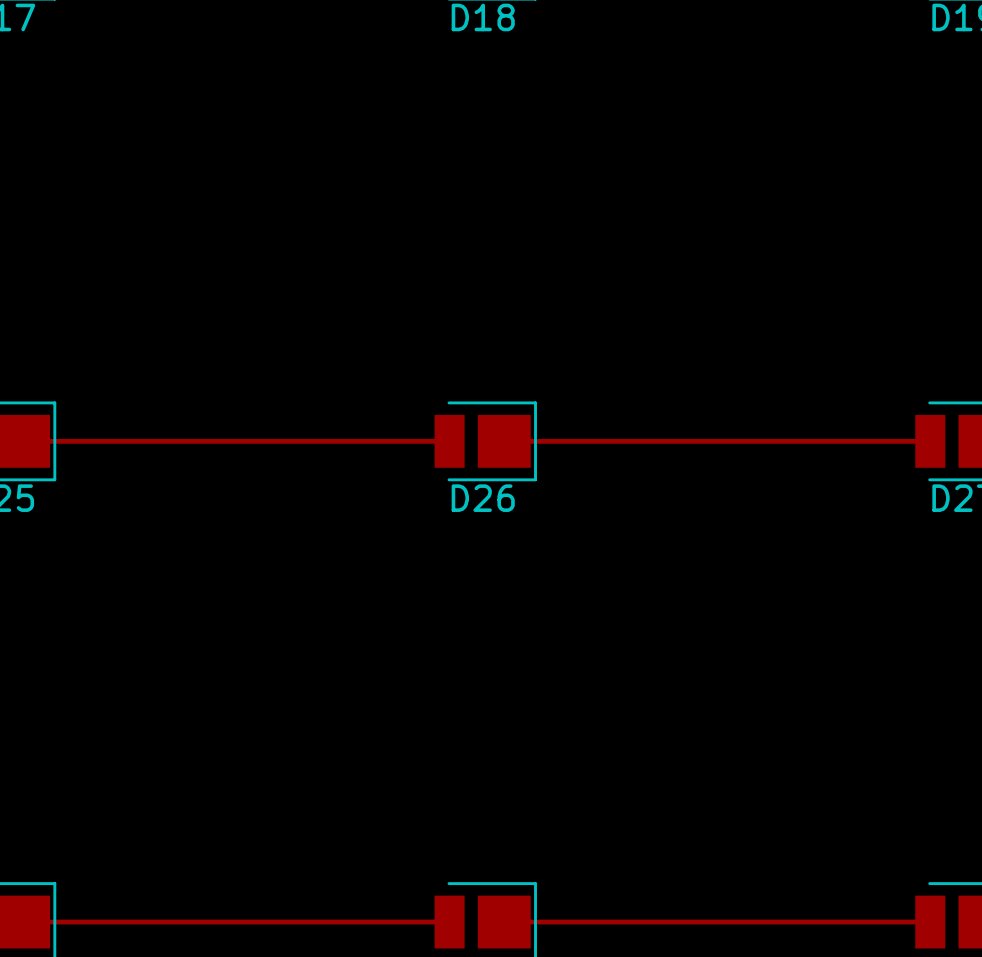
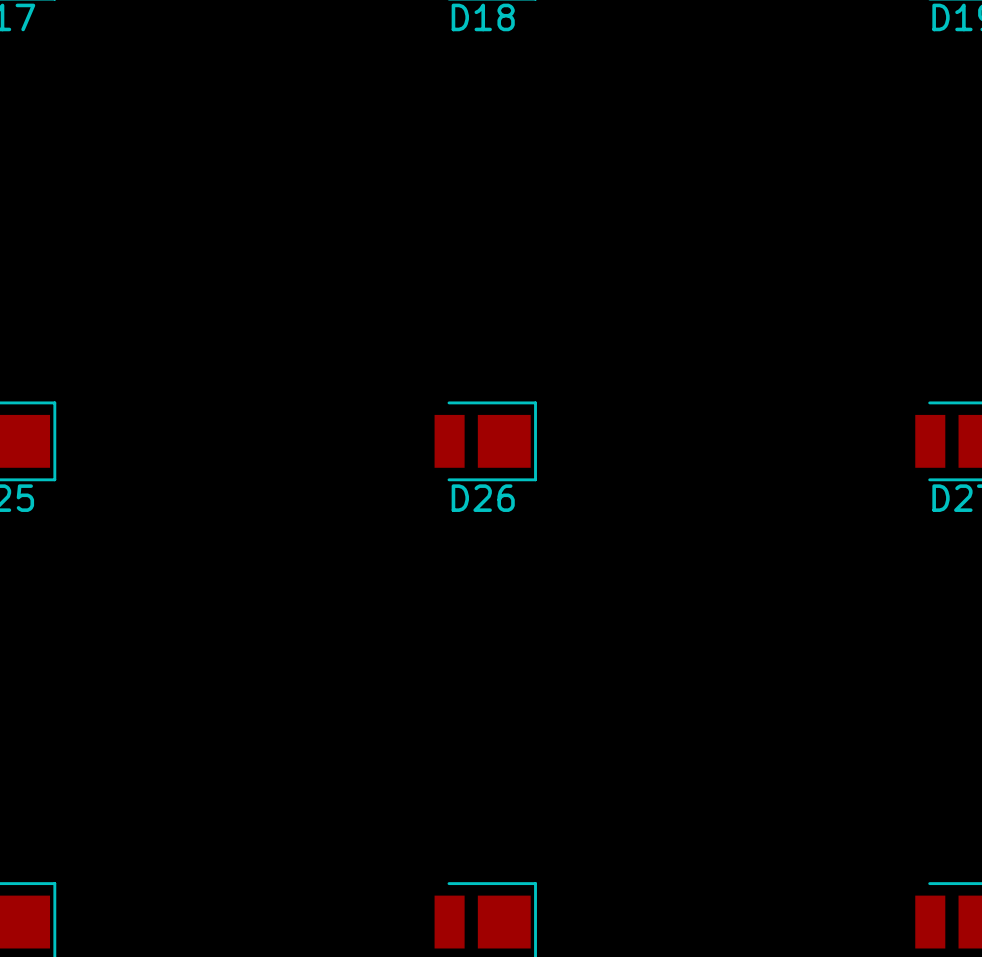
top track: (23, 441) (449, 441) -> none
top track: (504, 441) (930, 441) -> none
top track: (23, 922) (449, 922) -> none
top track: (504, 922) (930, 922) -> none

